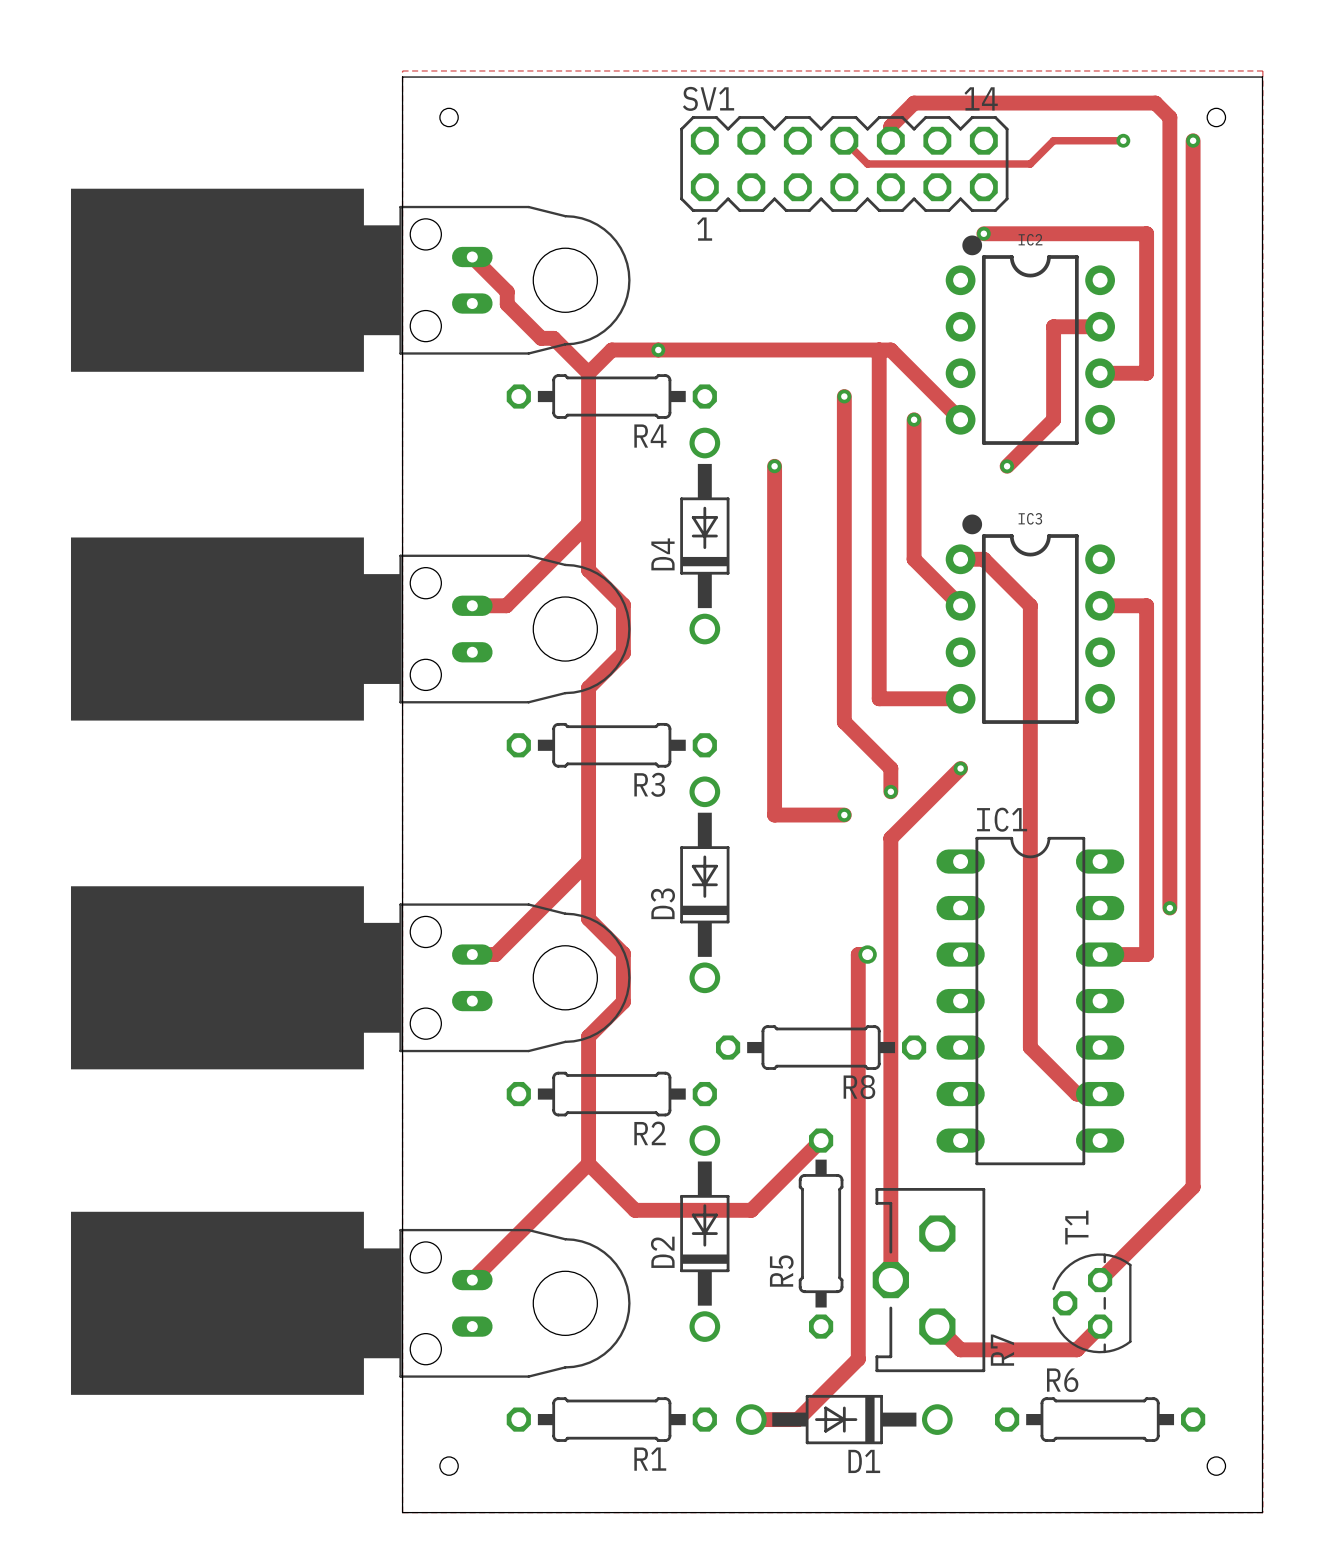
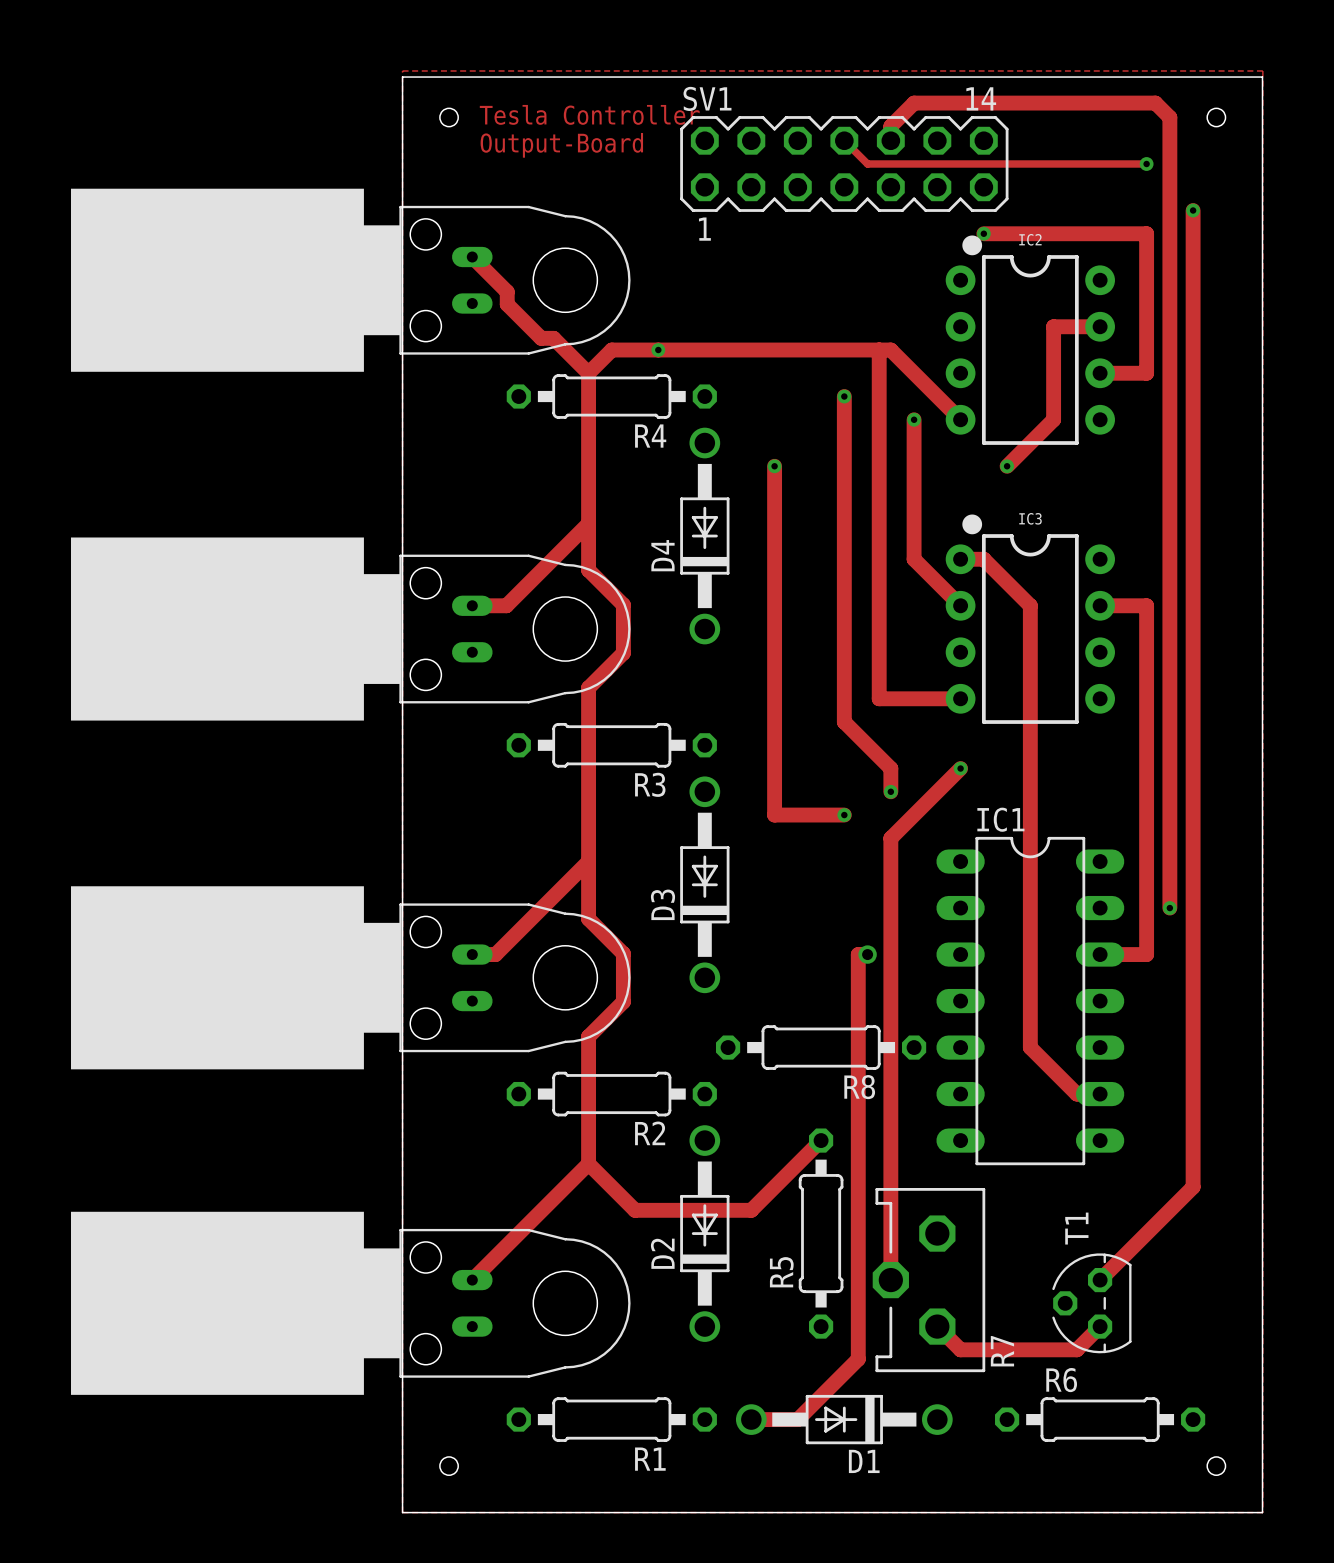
text: none -> Tesla Controller (589, 114)
track: (1123, 140) (1053, 140) (1030, 163) -> (1146, 163) (1030, 163)
via: (1123, 140) -> none
track: (1193, 140) (1193, 210) -> none
via: (1193, 140) -> none
text: none -> Output-Board (561, 145)
via: none -> (1146, 163)
via: none -> (1193, 210)

